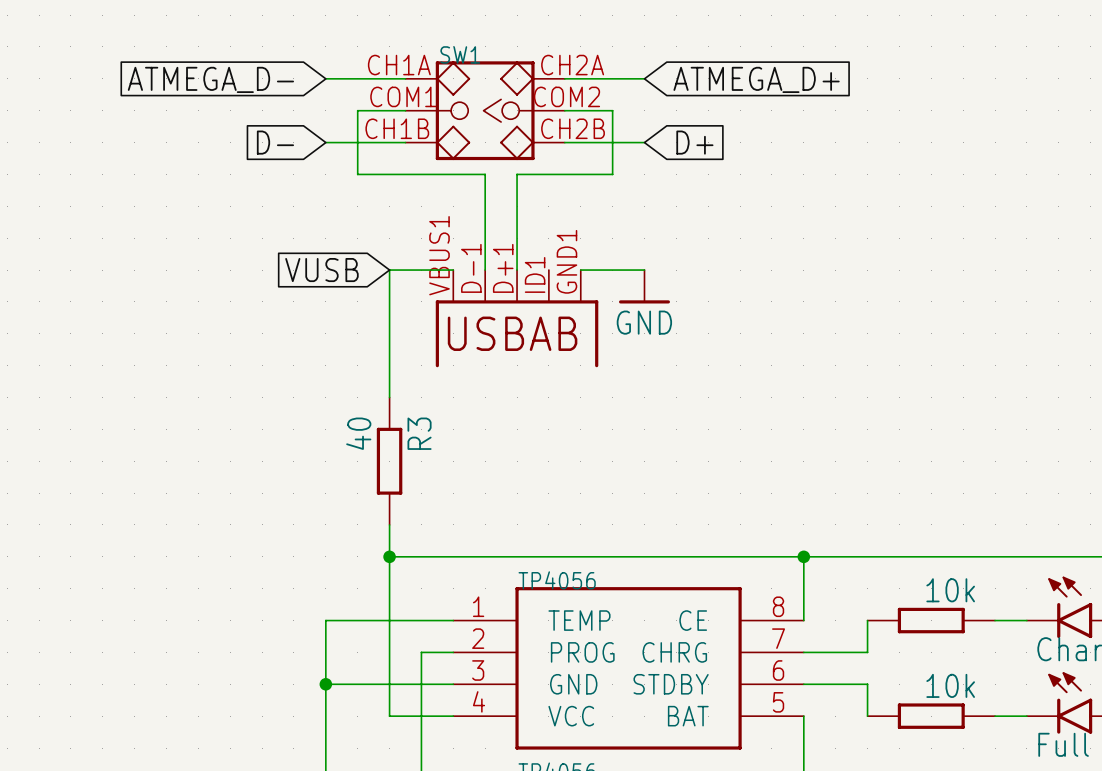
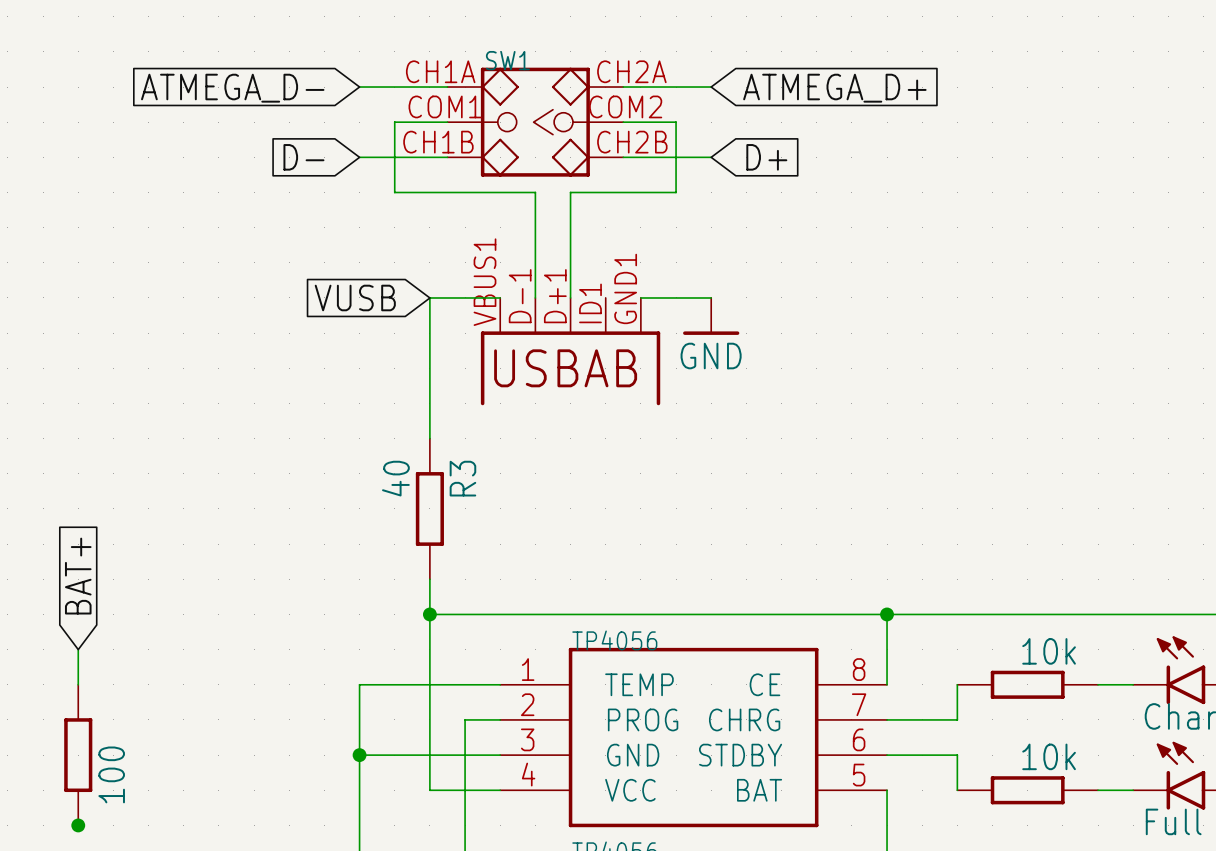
global label: none -> BAT+ (78, 576)
wire: none -> (78, 649) (78, 684)
part: none -> 100 (78, 755)
junction: none -> (78, 825)

